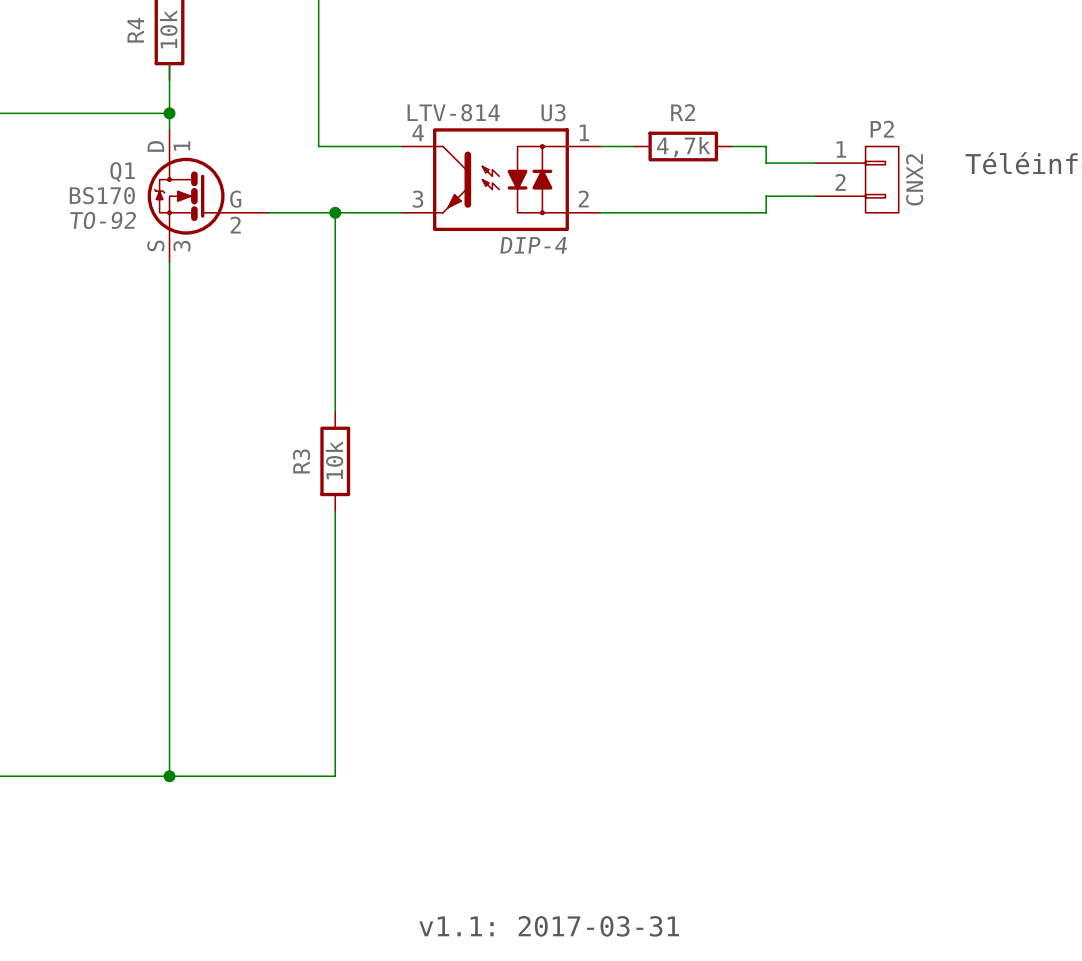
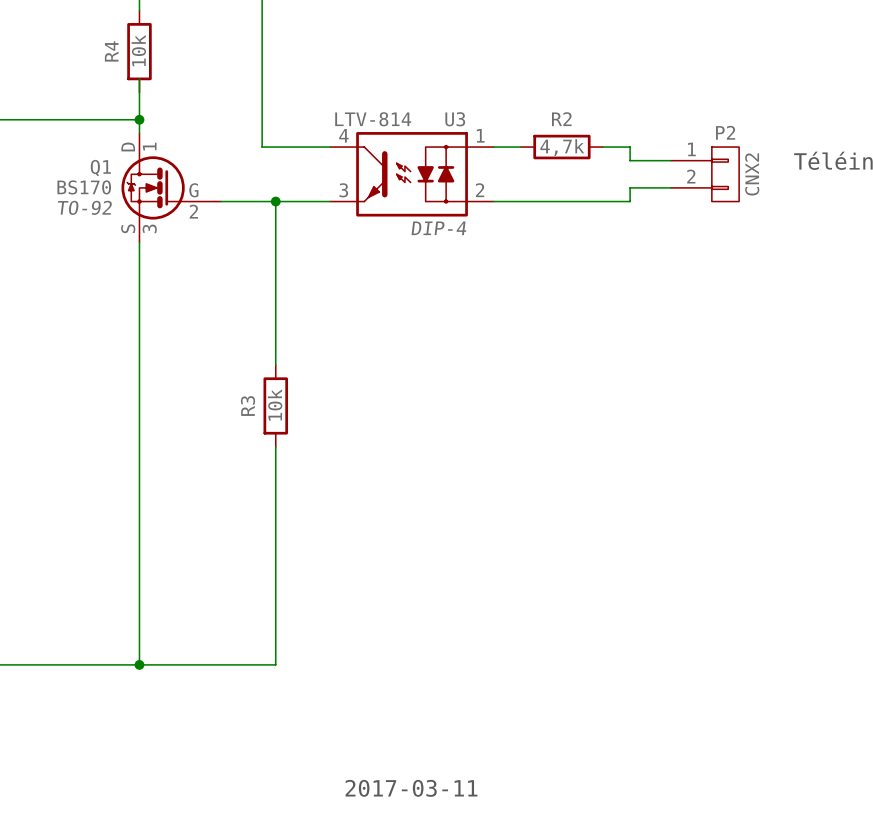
text: v1.1: 2017-03-31 (549, 926) -> 2017-03-11 (411, 788)

